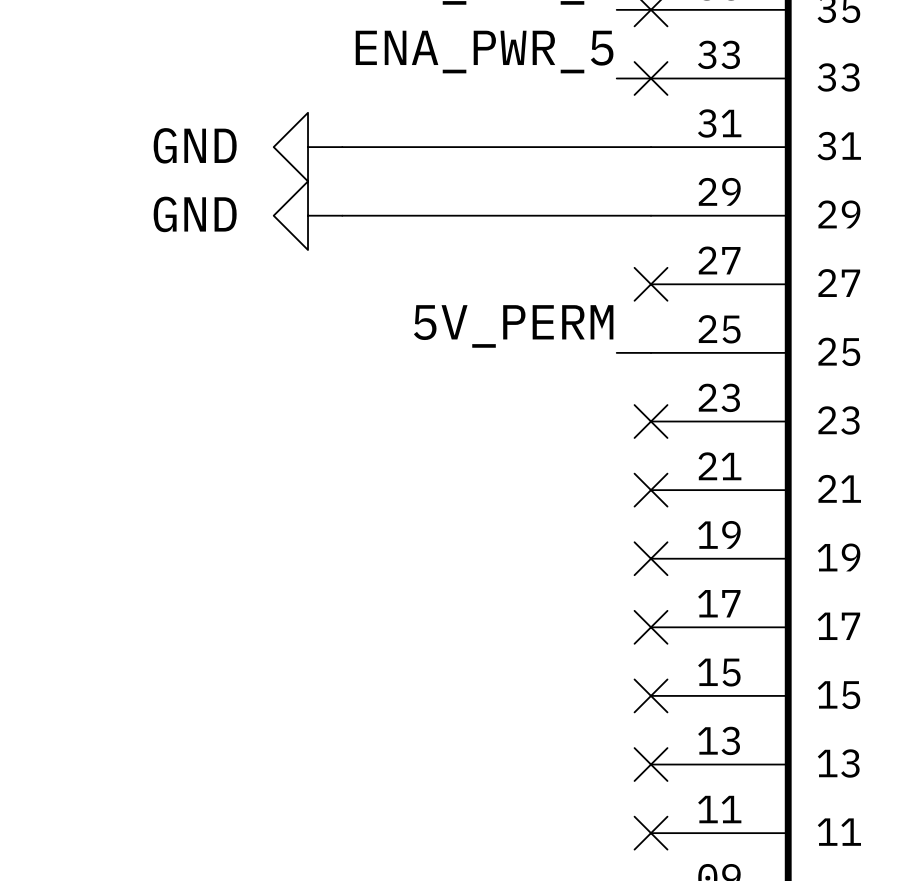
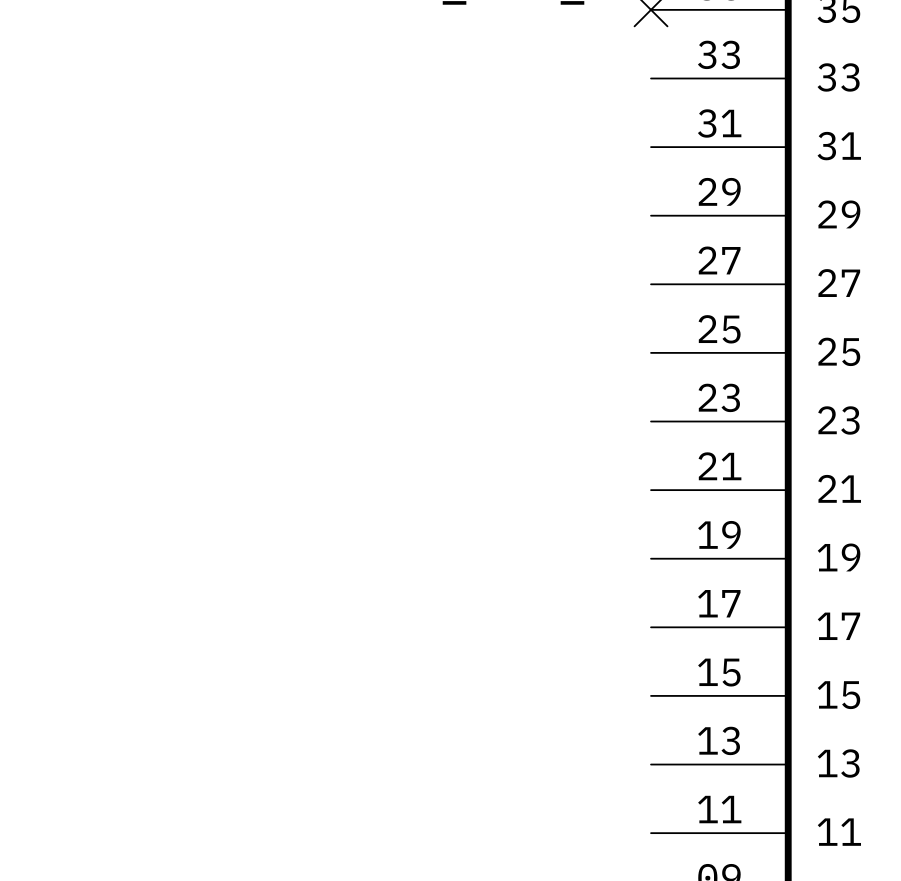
wire: (616, 9) (651, 9) -> none
label: ENA_PWR_5 (484, 52) -> none
wire: (616, 78) (651, 78) -> none
no-connect mark: (651, 78) -> none
power symbol: GND (308, 147) -> none
wire: (342, 147) (651, 147) -> none
power symbol: GND (308, 215) -> none
wire: (342, 215) (651, 215) -> none
no-connect mark: (651, 284) -> none
label: 5V_PERM (513, 326) -> none
wire: (616, 352) (651, 352) -> none
no-connect mark: (651, 421) -> none
no-connect mark: (651, 490) -> none
no-connect mark: (651, 558) -> none
no-connect mark: (651, 627) -> none
no-connect mark: (651, 695) -> none
no-connect mark: (651, 764) -> none
no-connect mark: (651, 833) -> none

